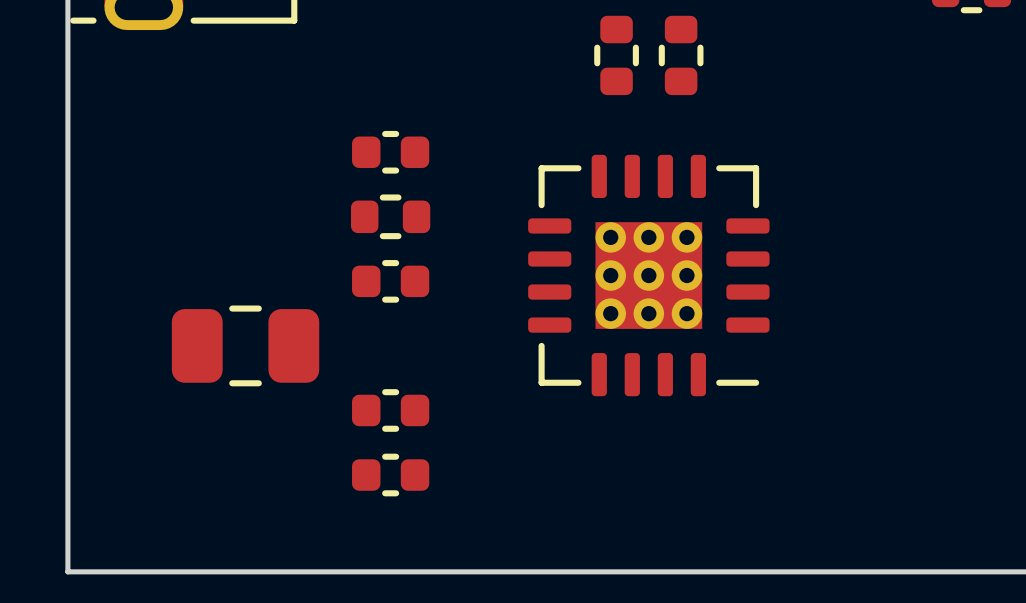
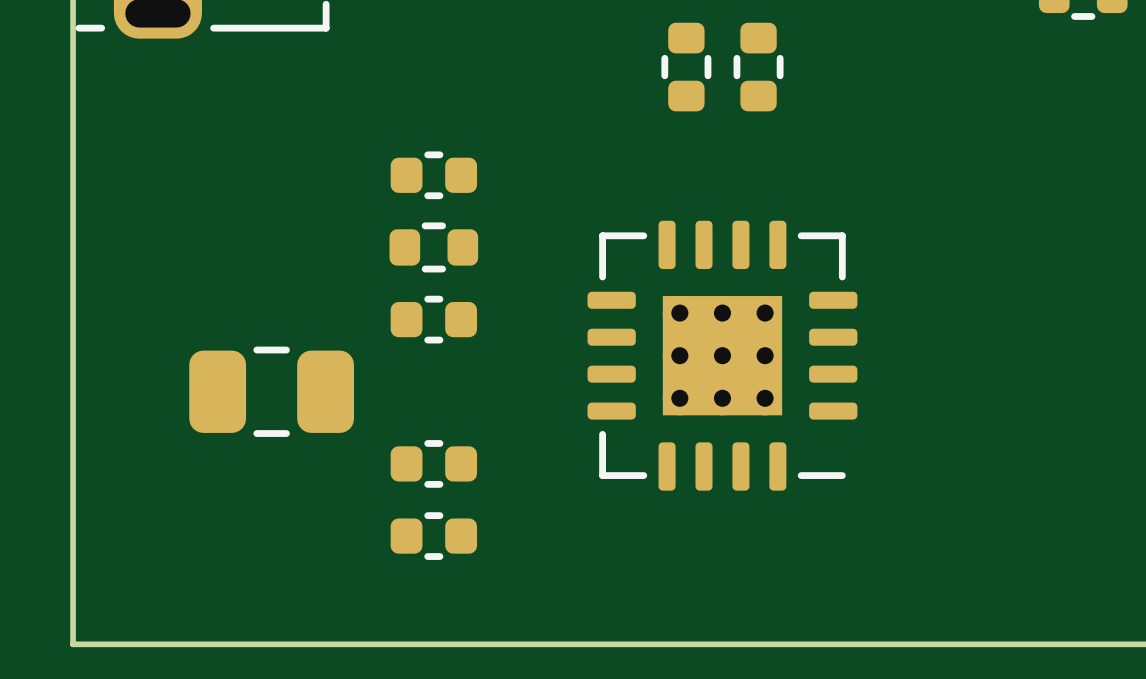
part position: (648, 275) -> (722, 355)

